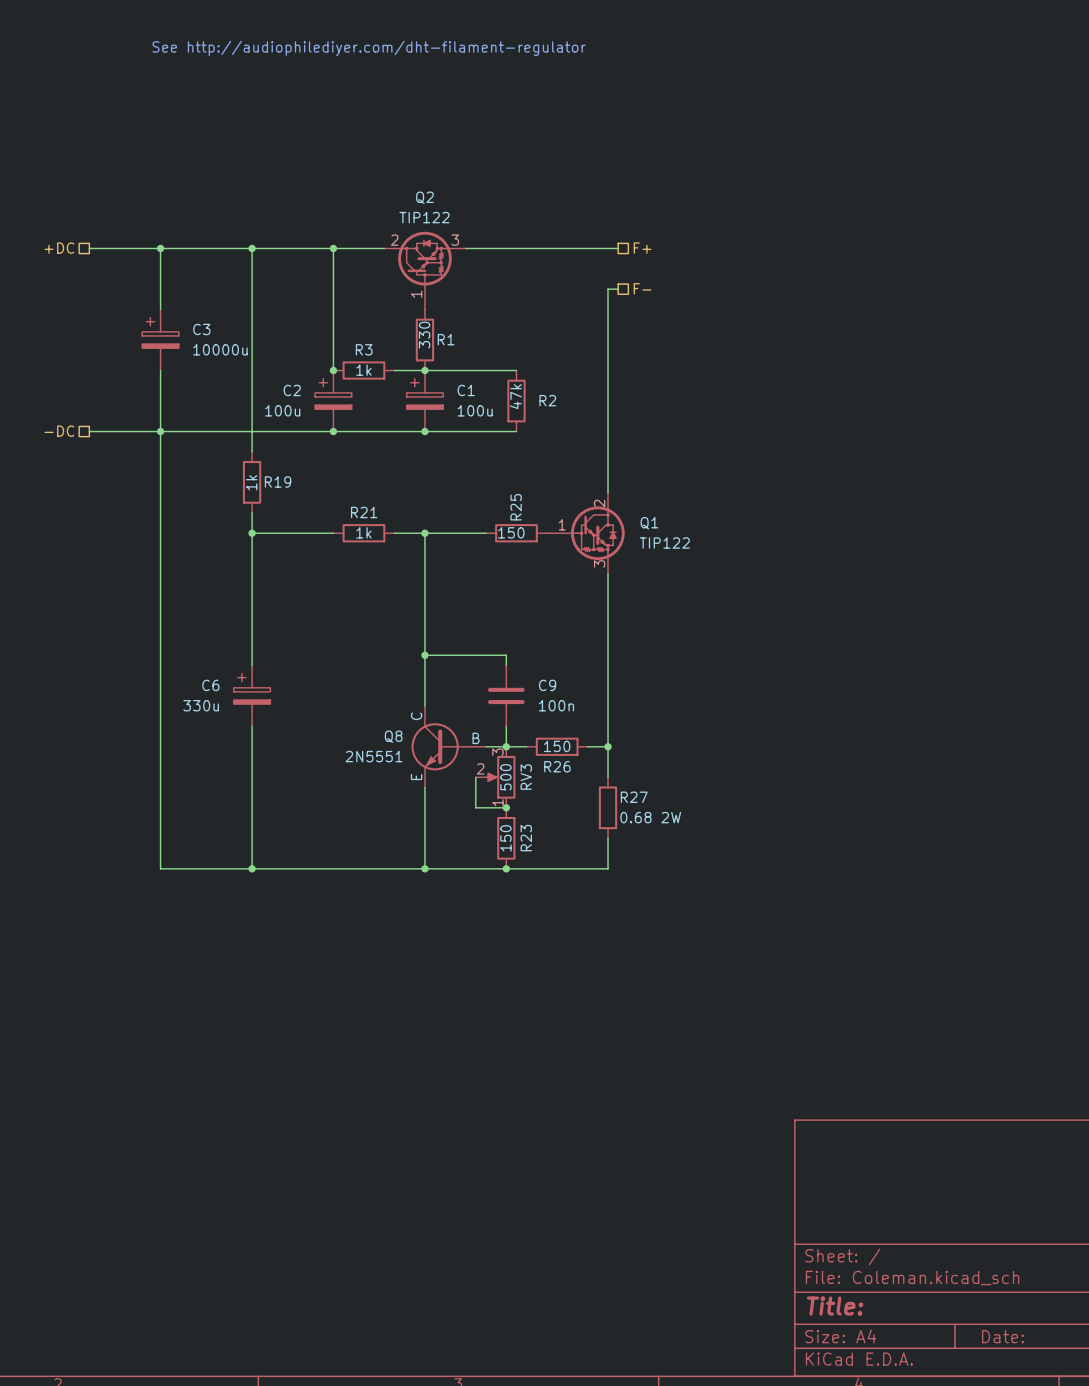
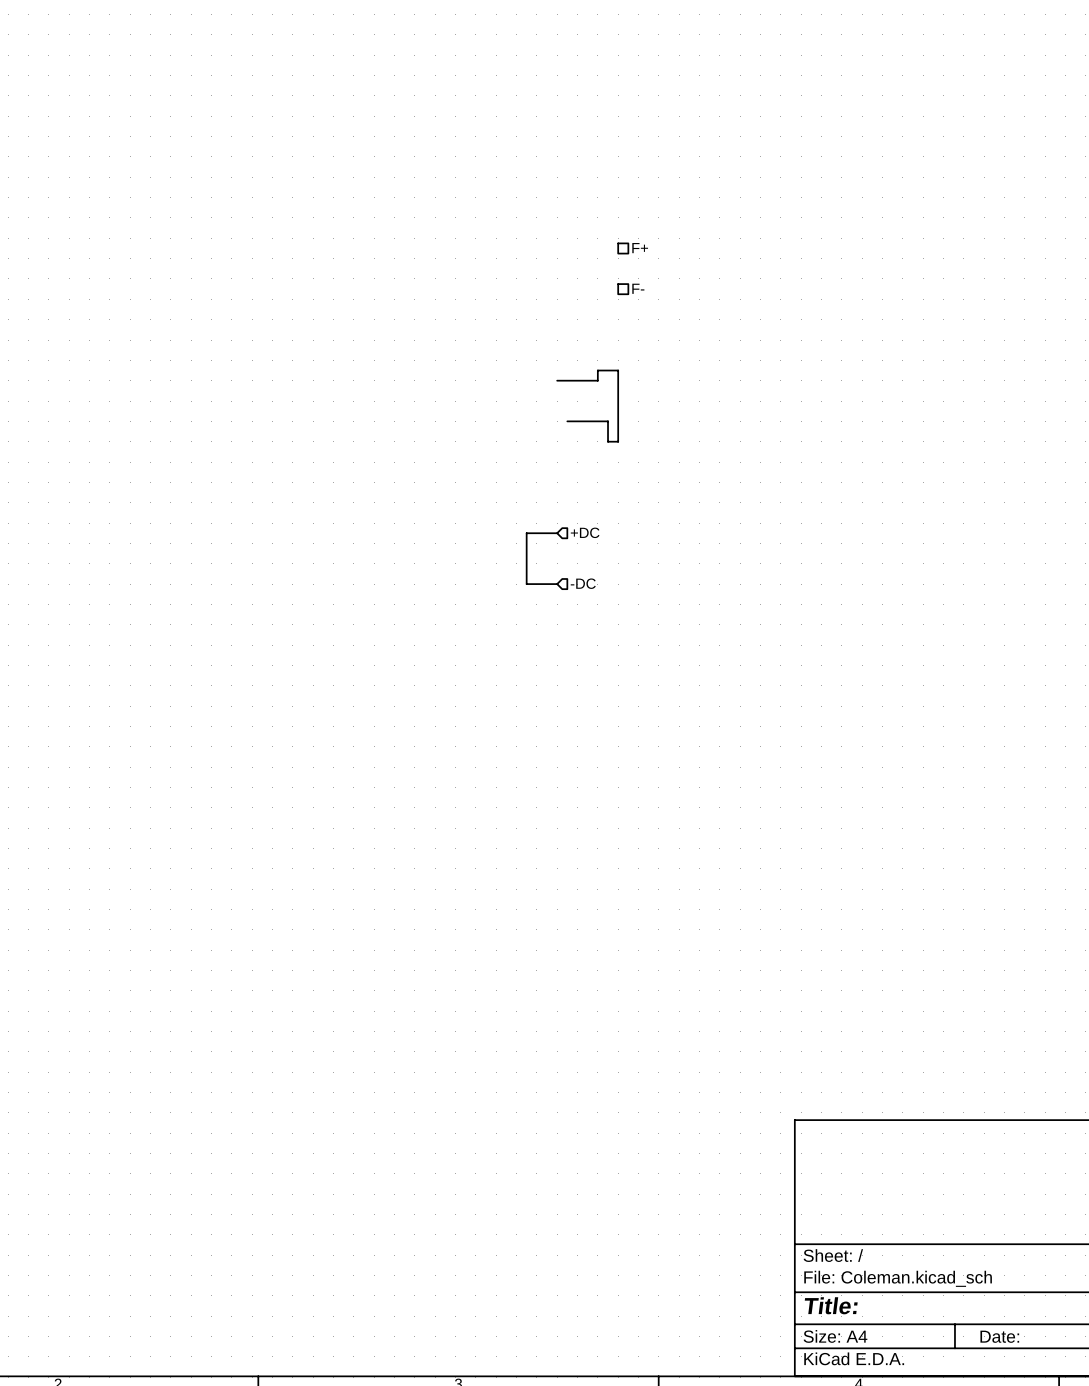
text: See http://audiophilediyer.com/dht-filament-regulator (369, 48) -> none
hierarchical label: +DC (59, 248) -> none
wire: (89, 248) (384, 248) -> none
wire: (160, 248) (160, 309) -> none
junction: (160, 248) -> none
wire: (252, 248) (252, 451) -> none
junction: (252, 248) -> none
wire: (333, 248) (333, 370) -> none
junction: (333, 248) -> none
wire: (465, 248) (618, 248) -> none
Q2: TIP122 (424, 270) -> none
wire: (618, 289) (608, 289) (608, 421) -> (567, 421) (608, 421)
C3: 10000u (160, 340) -> none
R1: 330 (424, 340) -> none
wire: (160, 370) (160, 868) (608, 868) (608, 838) -> none
junction: (333, 370) -> none
R3: 1k (363, 370) -> none
wire: (394, 370) (516, 370) -> none
junction: (424, 370) -> none
C2: 100u (333, 401) -> none
C1: 100u (424, 401) -> none
R2: 47k (516, 401) -> none
hierarchical label: -DC (59, 431) -> none
wire: (89, 431) (516, 431) -> none
junction: (160, 431) -> none
junction: (333, 431) -> none
junction: (424, 431) -> none
wire: (608, 441) (608, 492) -> (608, 441) (618, 441) (618, 370) (597, 370) (597, 380) (557, 380)
R19: 1k (252, 482) -> none
wire: (252, 512) (252, 665) -> none
hierarchical label: none -> +DC (585, 532)
wire: (252, 533) (333, 533) -> none
junction: (252, 533) -> none
R21: 1k (363, 533) -> none
wire: (394, 533) (485, 533) -> none
wire: (424, 533) (424, 706) -> none
junction: (424, 533) -> none
R25: 150 (516, 533) -> none
wire: none -> (557, 533) (526, 533) (526, 584) (557, 584)
Q1: TIP122 (585, 533) -> none
wire: (608, 573) (608, 777) -> none
hierarchical label: none -> -DC (583, 583)
wire: (424, 655) (506, 655) (506, 665) -> none
junction: (424, 655) -> none
C6: 330u (252, 695) -> none
C9: 100n (506, 695) -> none
wire: (252, 726) (252, 868) -> none
wire: (506, 726) (506, 746) -> none
Q8: 2N5551 (448, 746) -> none
wire: (485, 746) (526, 746) -> none
junction: (506, 746) -> none
R26: 150 (557, 746) -> none
wire: (587, 746) (608, 746) -> none
junction: (608, 746) -> none
wire: (475, 777) (475, 807) (506, 807) -> none
RV3: 500 (495, 777) -> none
wire: (424, 787) (424, 868) -> none
junction: (506, 807) -> none
R27: 0.68 2W (608, 807) -> none
R23: 150 (506, 838) -> none
junction: (252, 868) -> none
junction: (424, 868) -> none
junction: (506, 868) -> none

